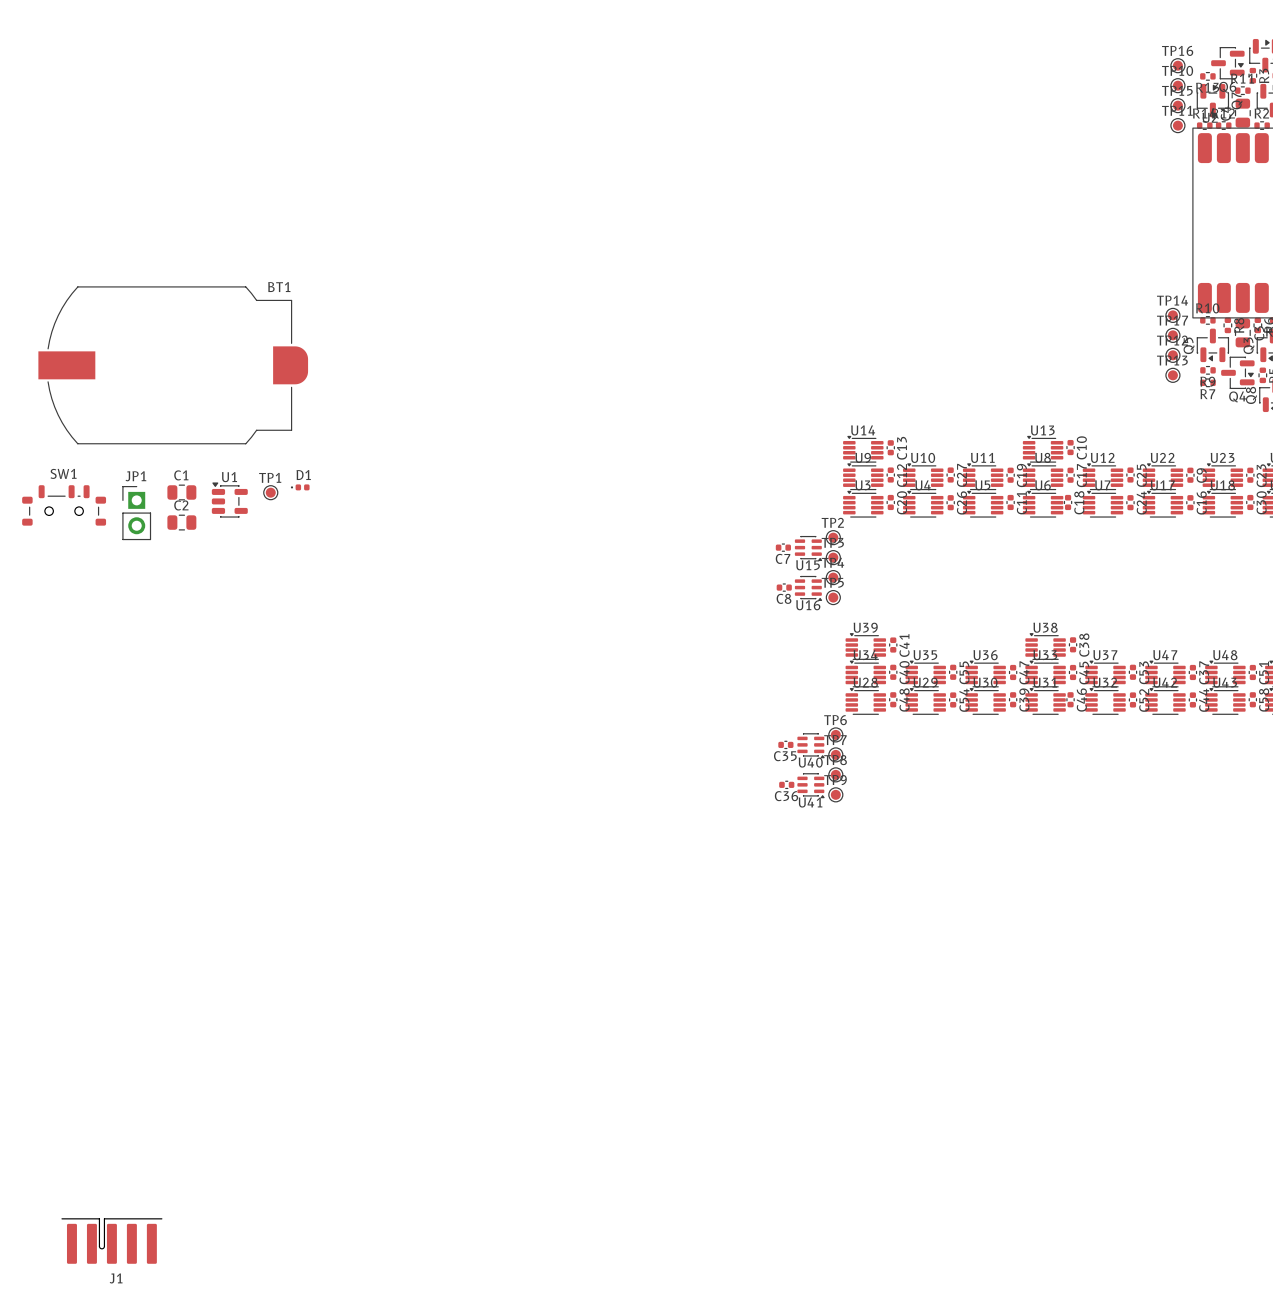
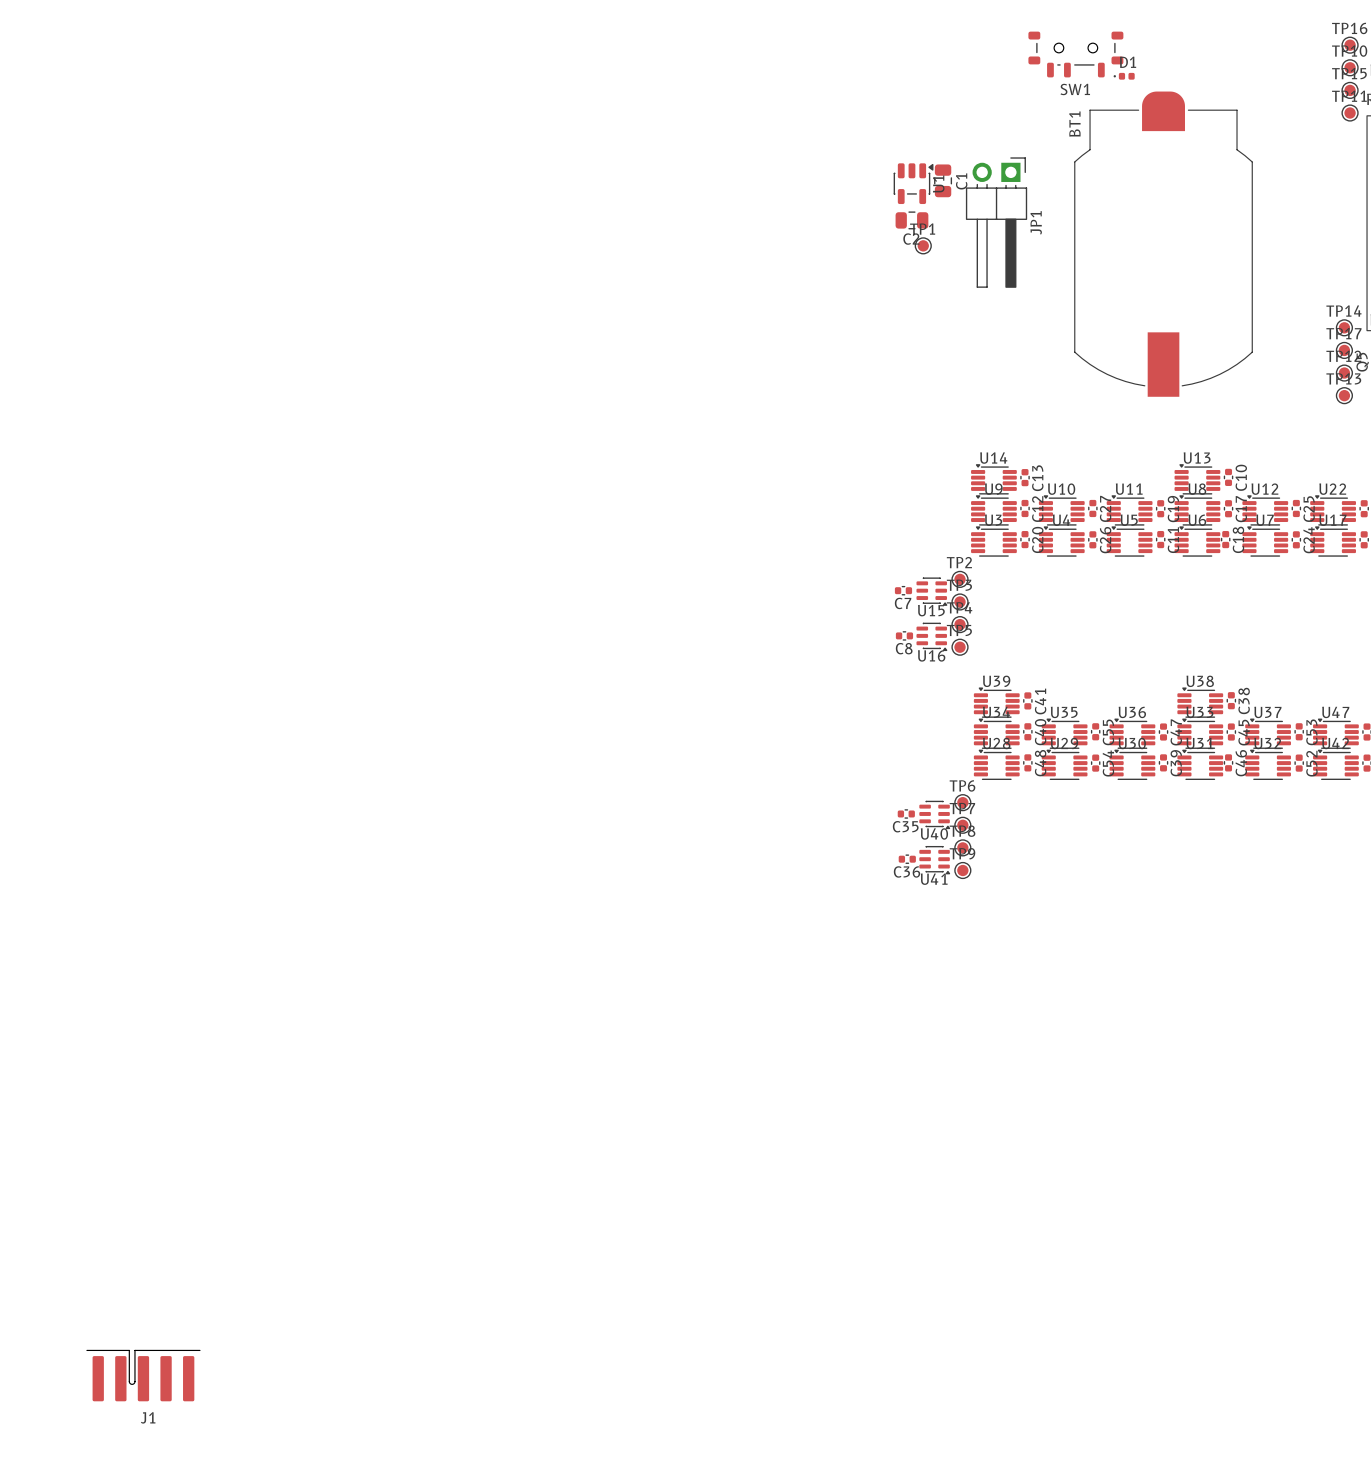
BT1 rotation: 0° (173, 365) -> 90° counterclockwise (1163, 244)
BT1 position: (173, 365) -> (1163, 244)
JP1 name position: JP1 (135, 476) -> JP1 (1036, 222)
JP1 footprint: [122, 486, 152, 541] -> [965, 157, 1028, 288]
D1 position: (300, 487) -> (1124, 76)
C1 rotation: 0° (181, 492) -> 90° clockwise (943, 180)
C1 position: (181, 492) -> (943, 180)
TP1 position: (270, 492) -> (923, 245)
U1 rotation: 0° (229, 500) -> 90° clockwise (913, 183)
U1 position: (229, 500) -> (913, 183)
SW1 rotation: 0° (64, 505) -> 180° (1075, 54)
SW1 position: (64, 505) -> (1075, 54)
C2 name position: C2 (181, 505) -> C2 (911, 239)
C2 position: (181, 522) -> (911, 220)

